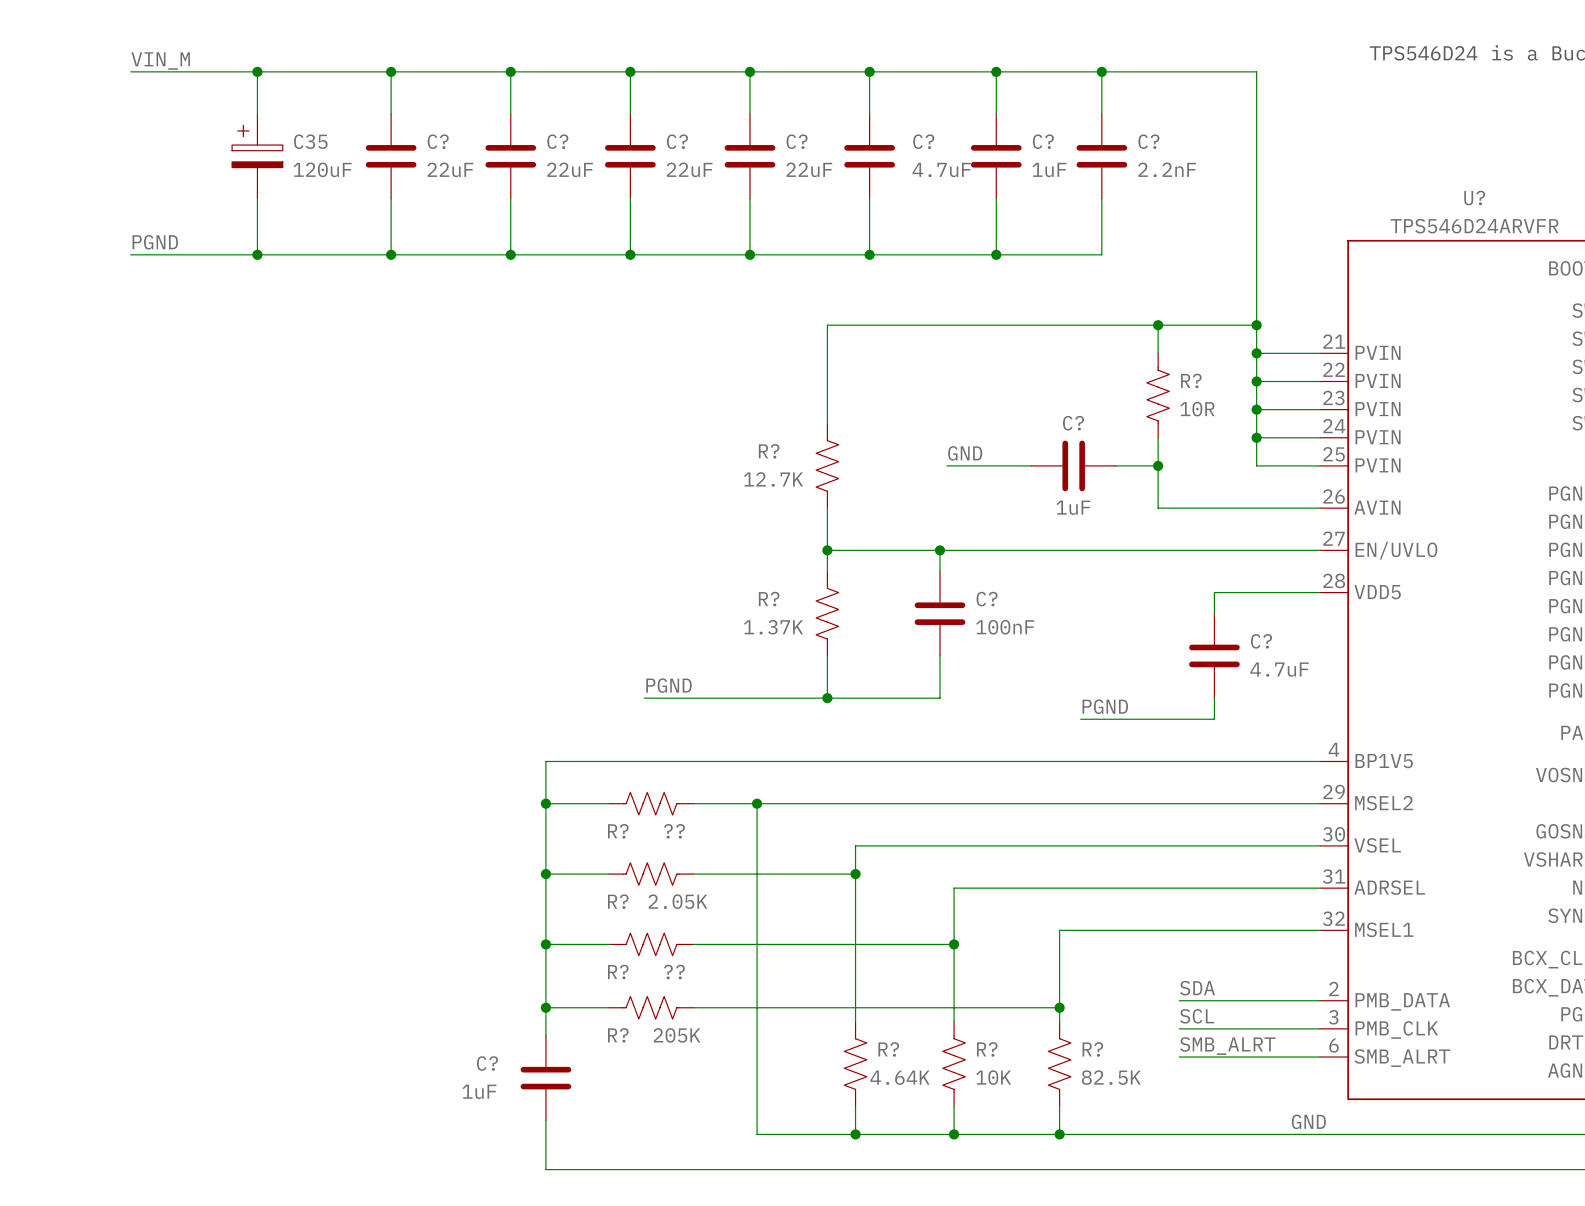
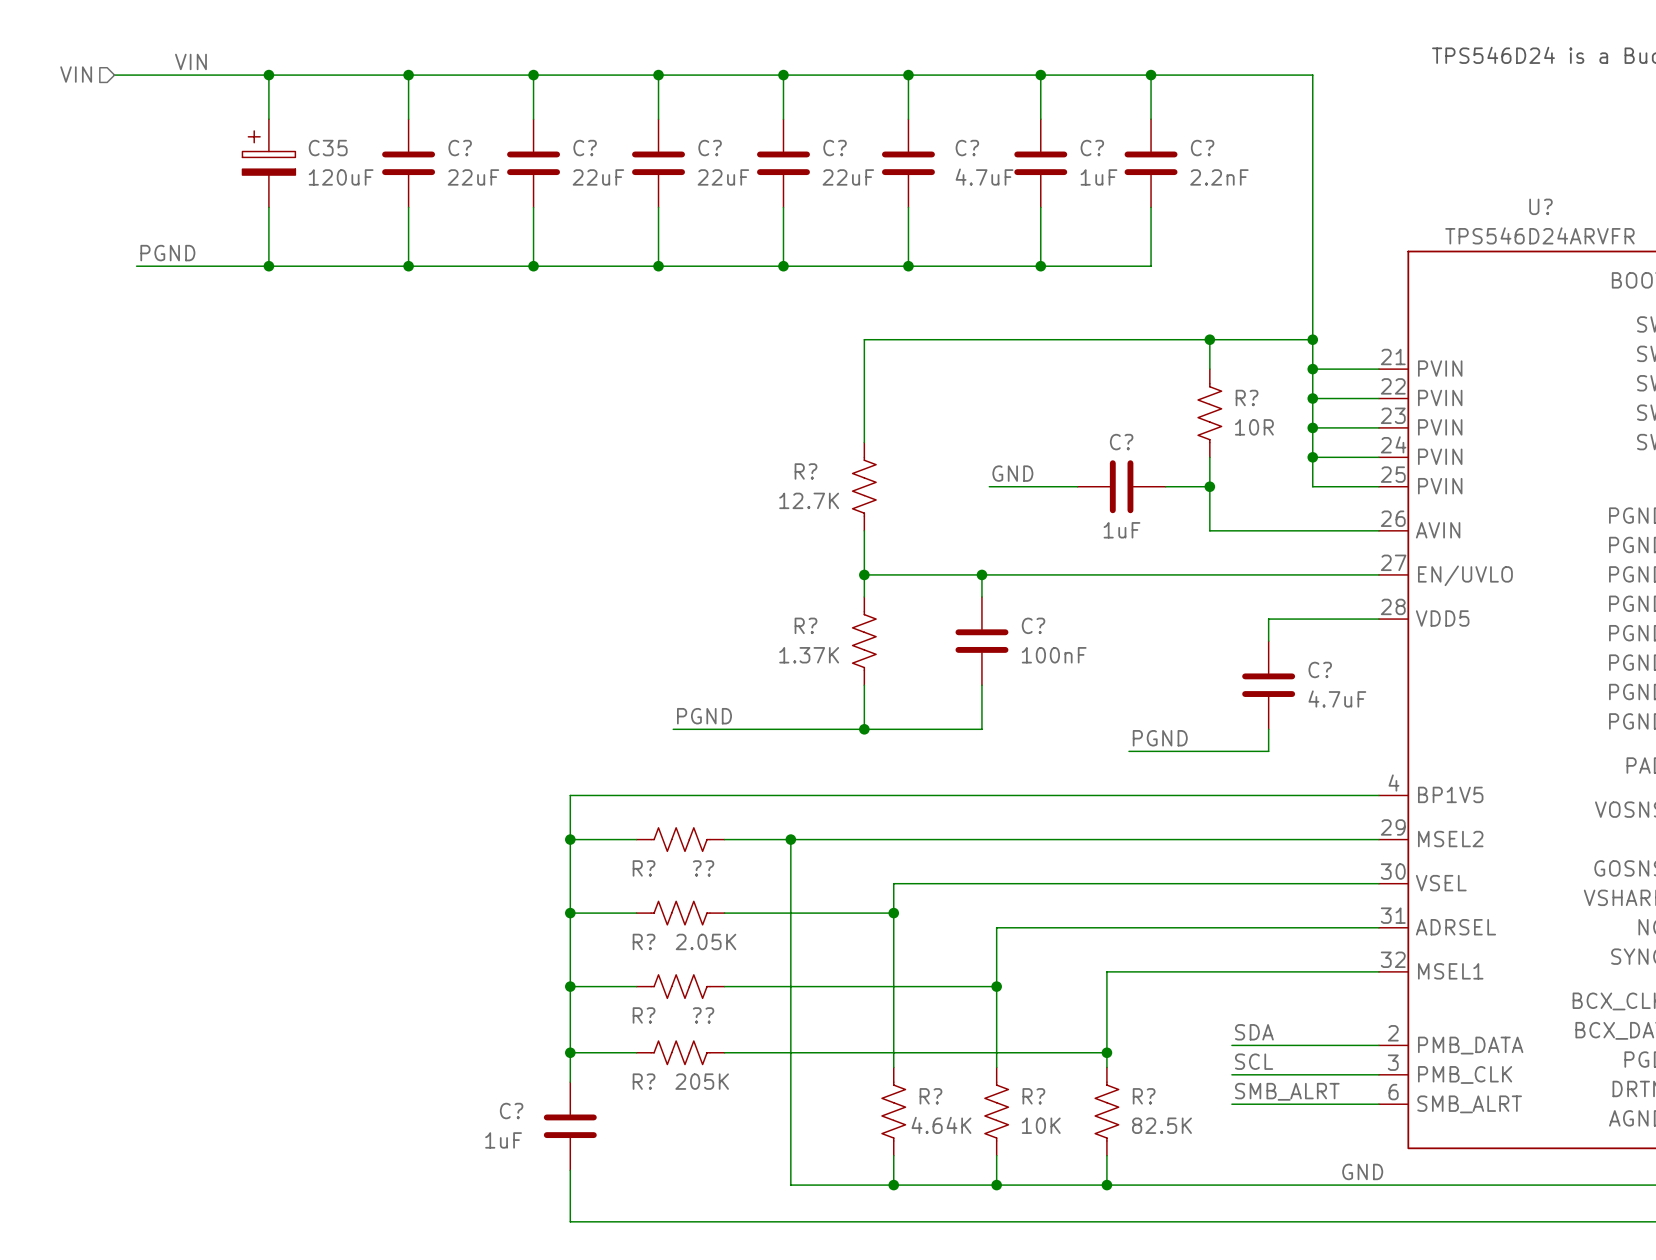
label: VIN_M (160, 61) -> VIN (190, 61)
hierarchical label: none -> VIN (76, 74)
wire: none -> (114, 75) (136, 75)

